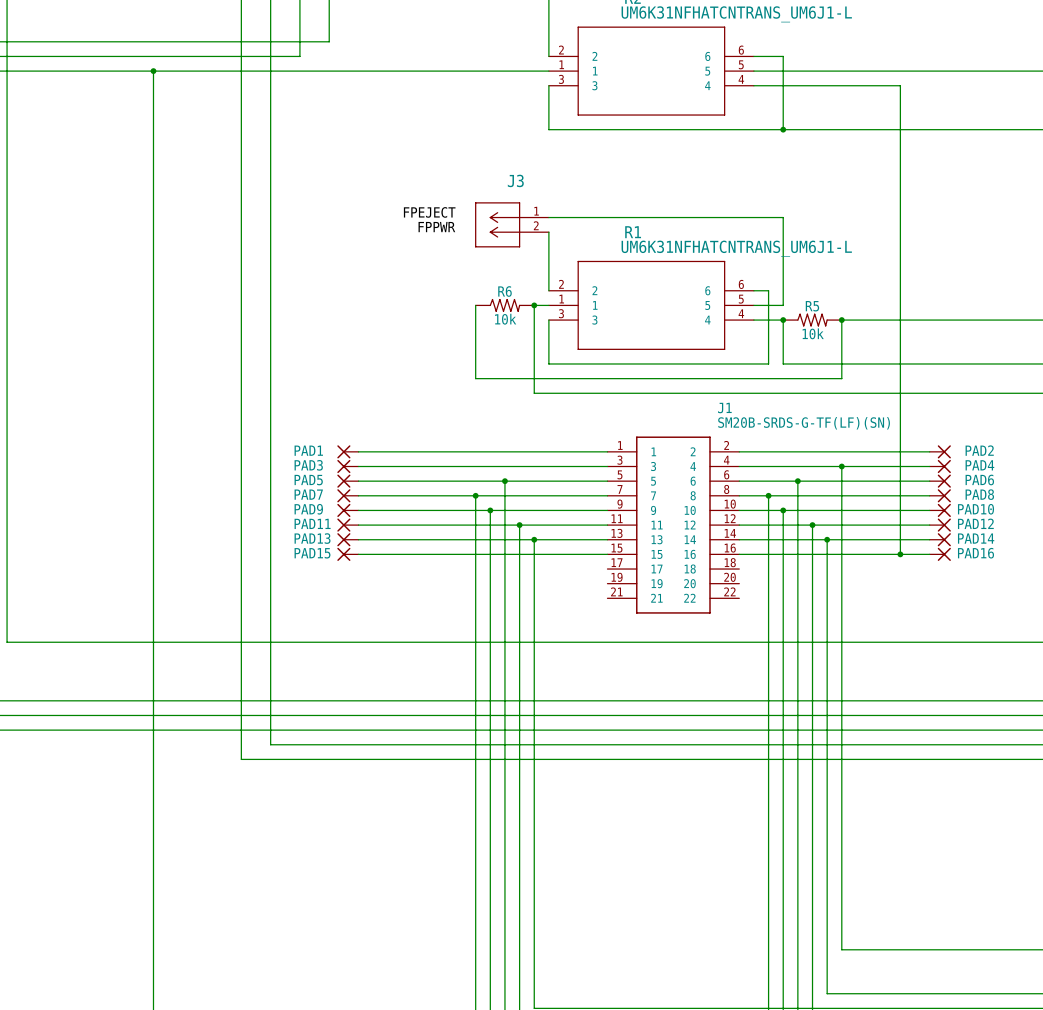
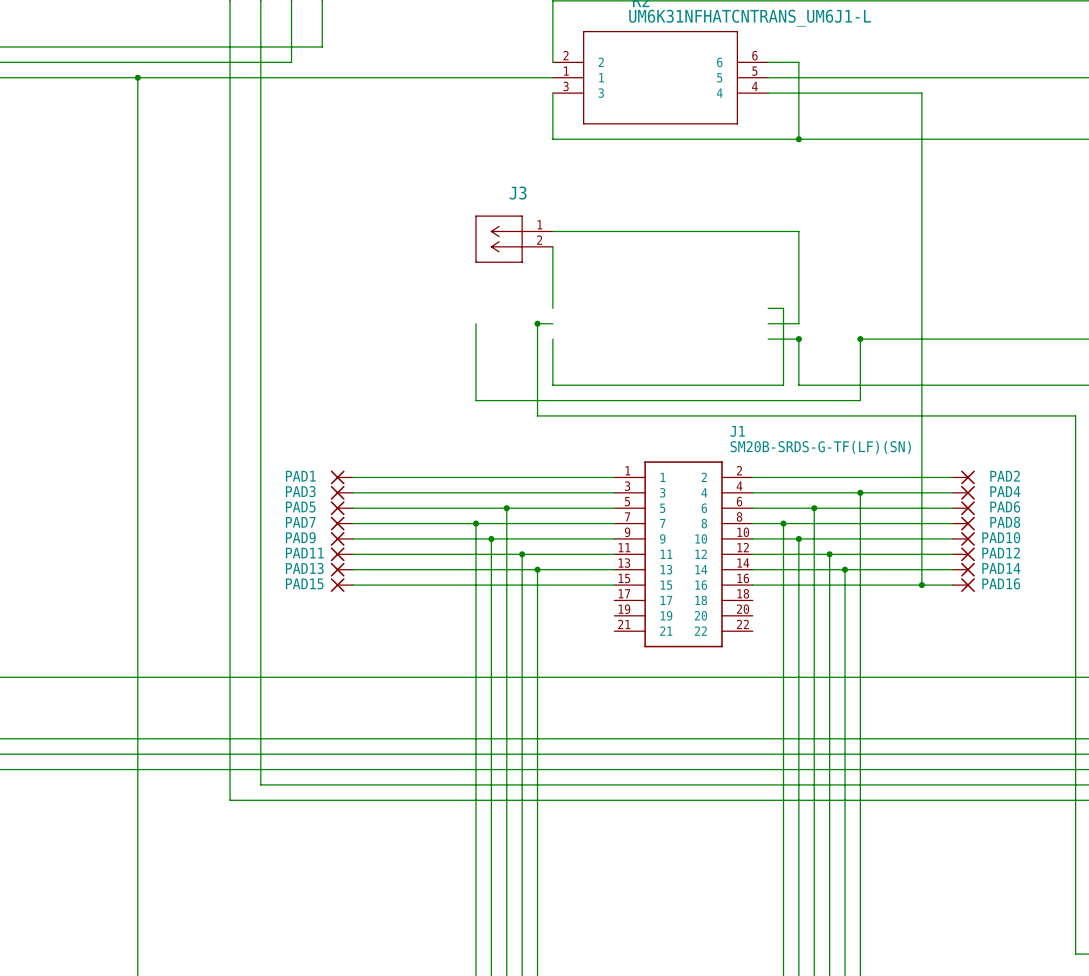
label: FPEJECT (429, 212) -> none
label: FPPWR (436, 227) -> none
R6: 10k (504, 305) -> none
R1: UM6K31NFHATCNTRANS_UM6J1-L (651, 305) -> none
R5: 10k (812, 320) -> none

